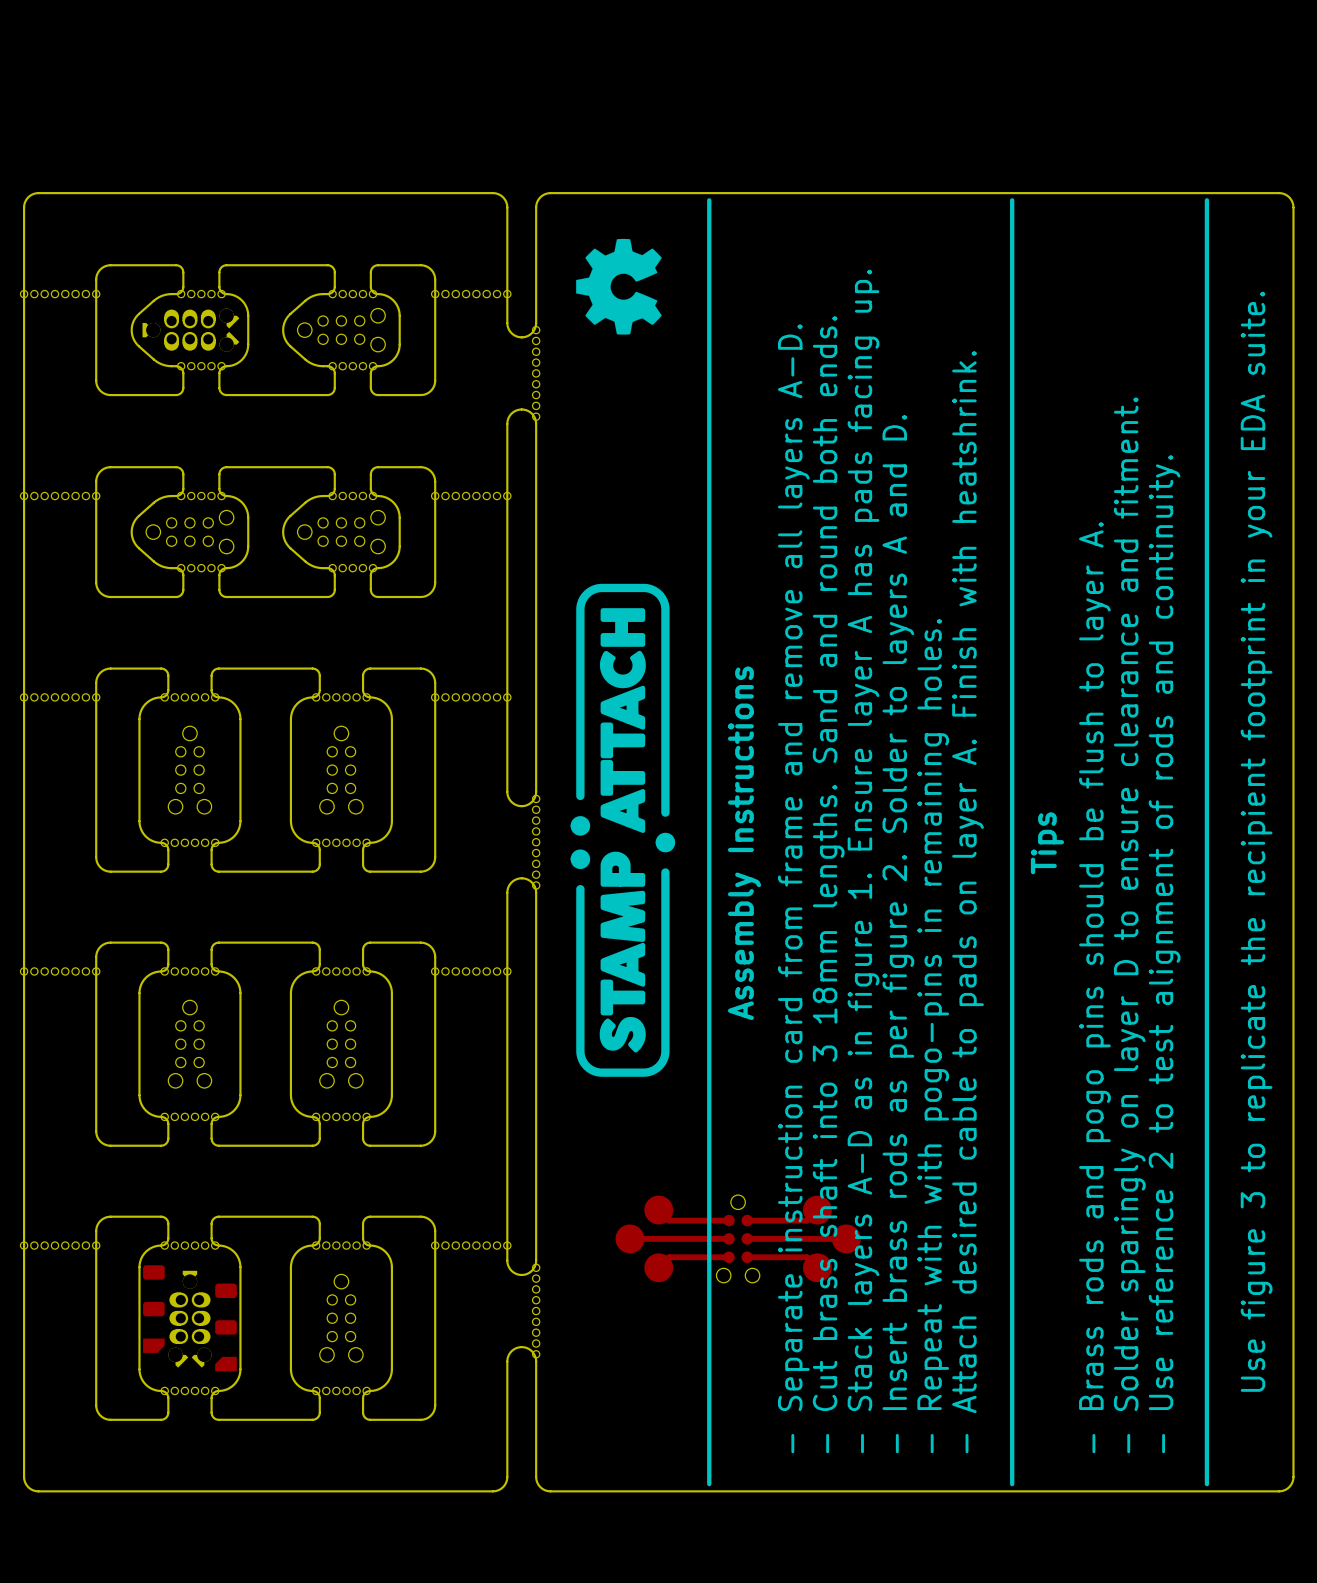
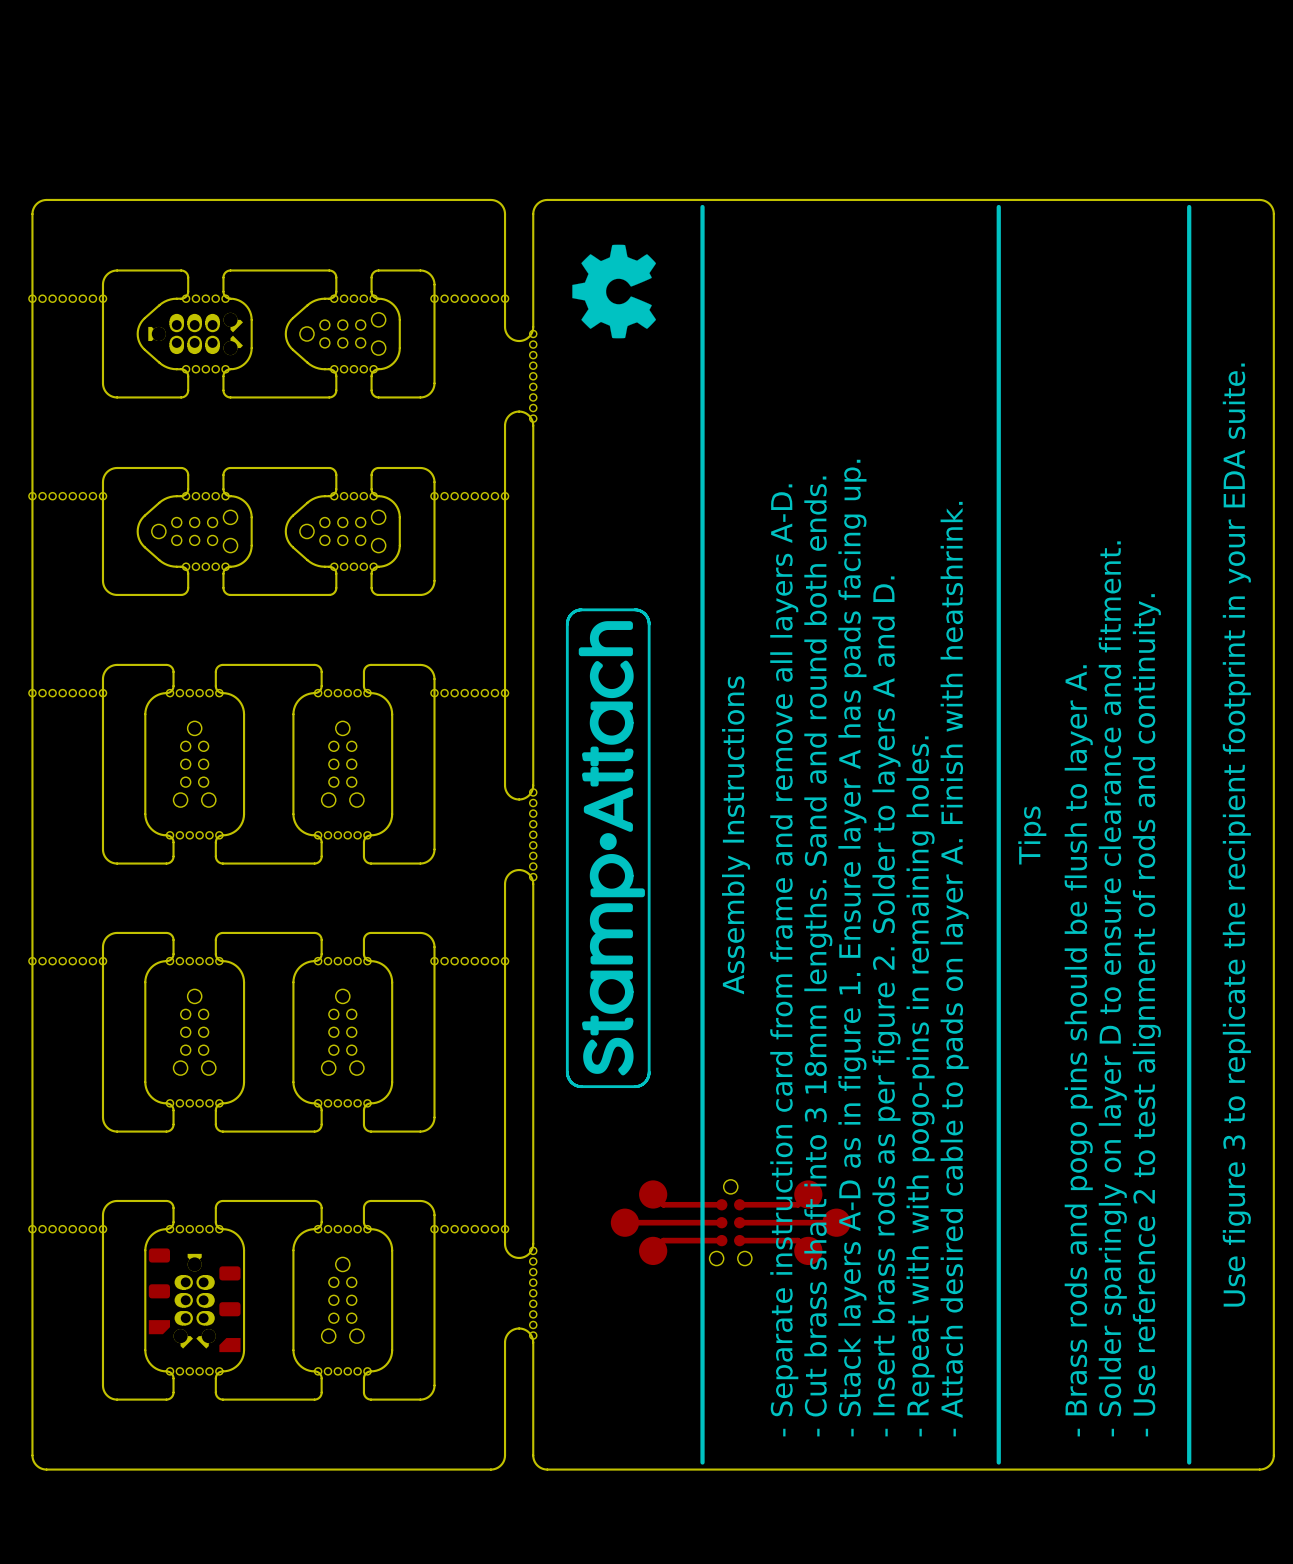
drawing: [570, 583, 676, 1077] -> none
line: none -> (636, 609) (578, 610) (570, 614) (567, 622) (567, 1072) (571, 1082) (580, 1086) (637, 1086) (645, 1081) (649, 1073) (649, 623) (645, 614) (636, 609)
drawing: none -> [578, 621, 634, 787]
drawing shape: [600, 789, 646, 833] -> [583, 787, 633, 832]
drawing: none -> [589, 833, 645, 965]
drawing shape: [600, 979, 646, 1016] -> [589, 970, 634, 1014]
drawing shape: [599, 1016, 646, 1053] -> [582, 1015, 634, 1036]
drawing: none -> [583, 1037, 634, 1076]

